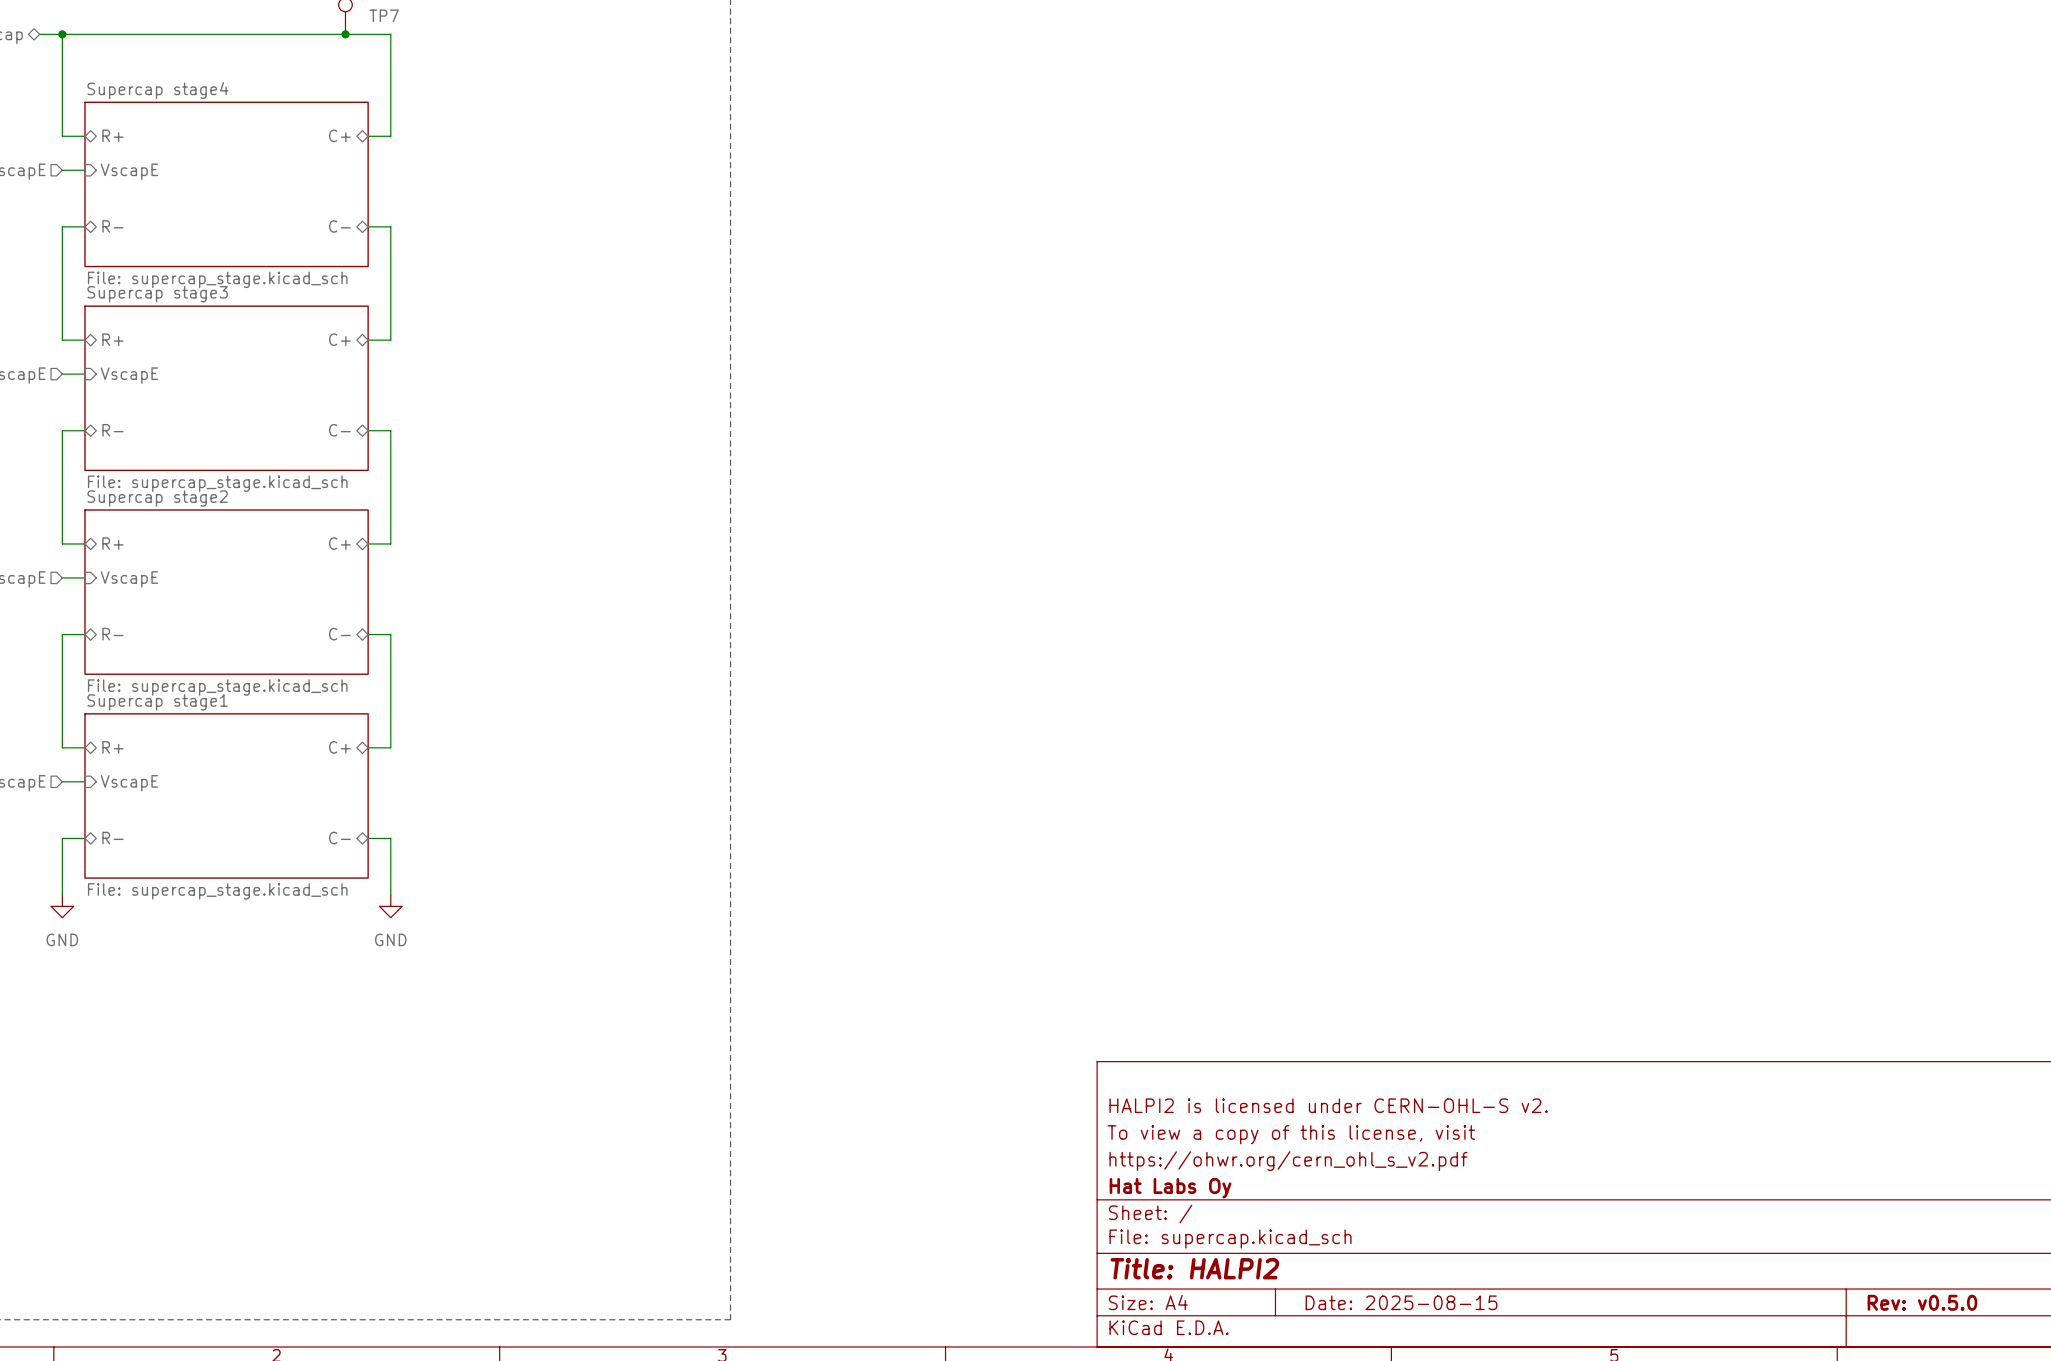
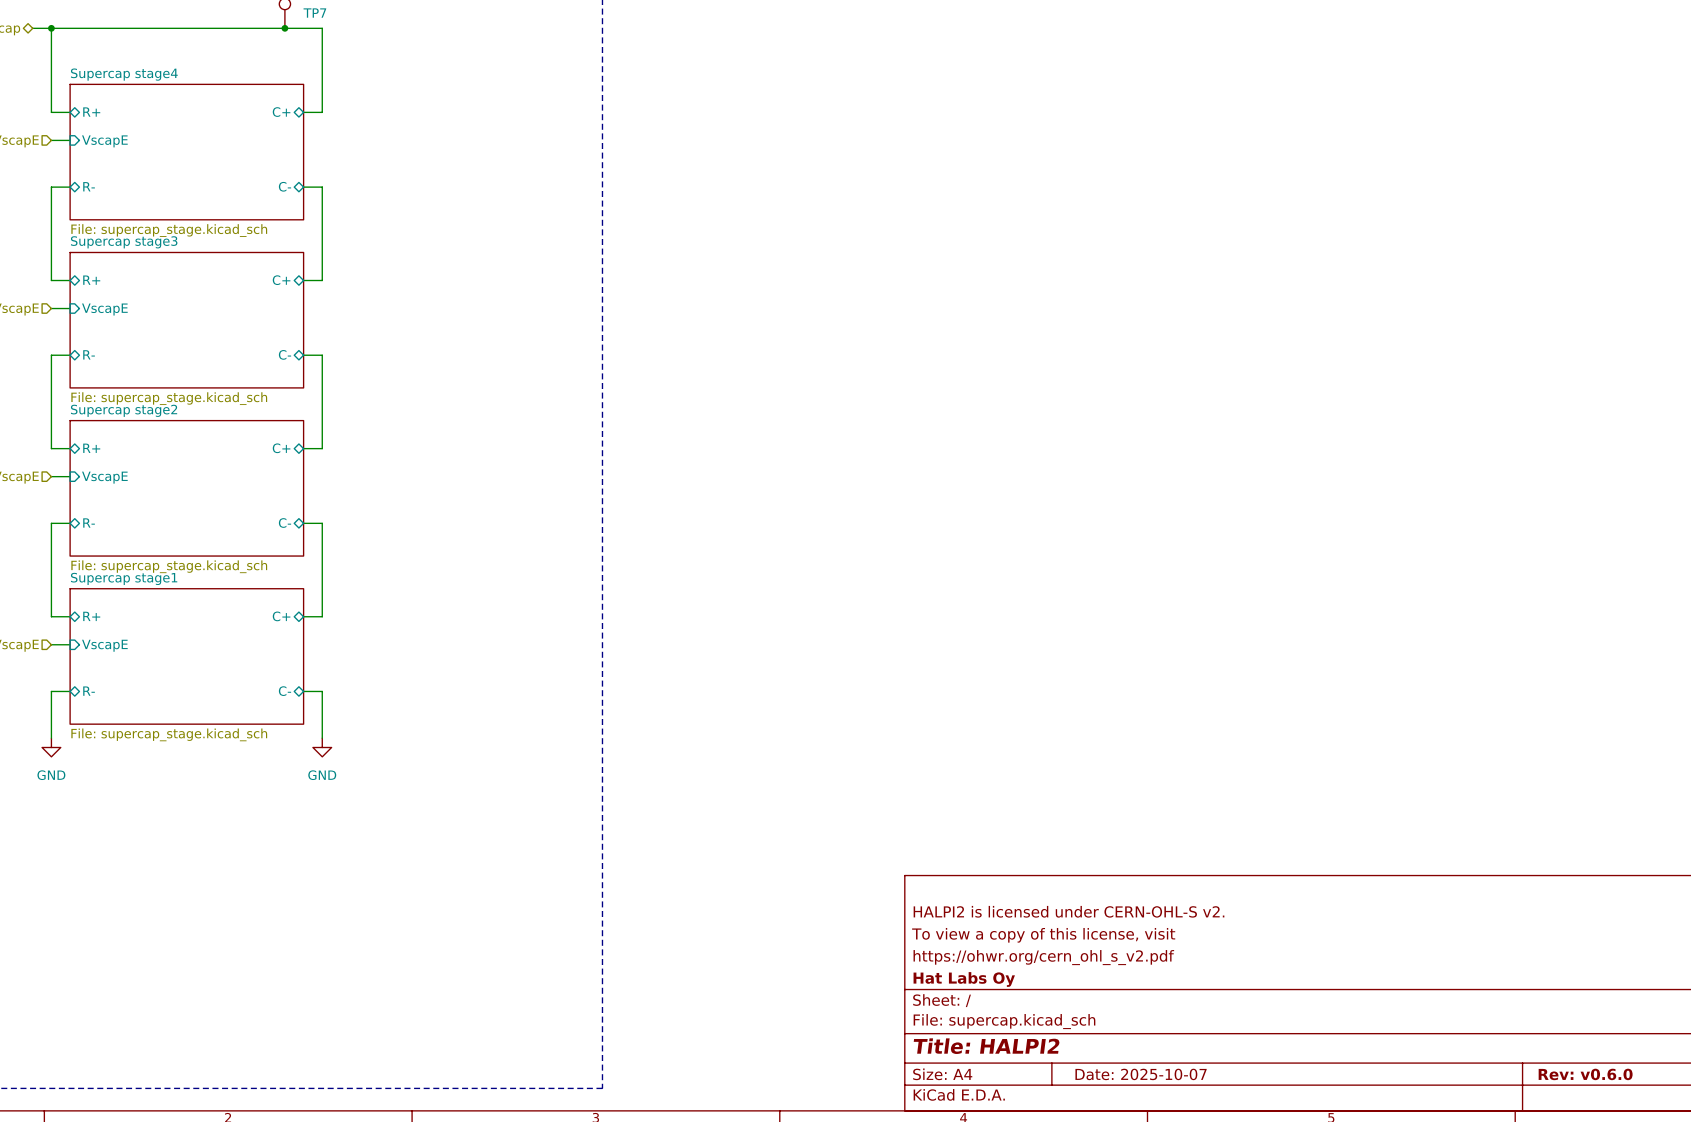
title block: Date: 2025-08-15 (1401, 1302) -> Date: 2025-10-07 (1141, 1074)
title block: Rev: v0.5.0 (1922, 1302) -> Rev: v0.6.0 (1585, 1074)

